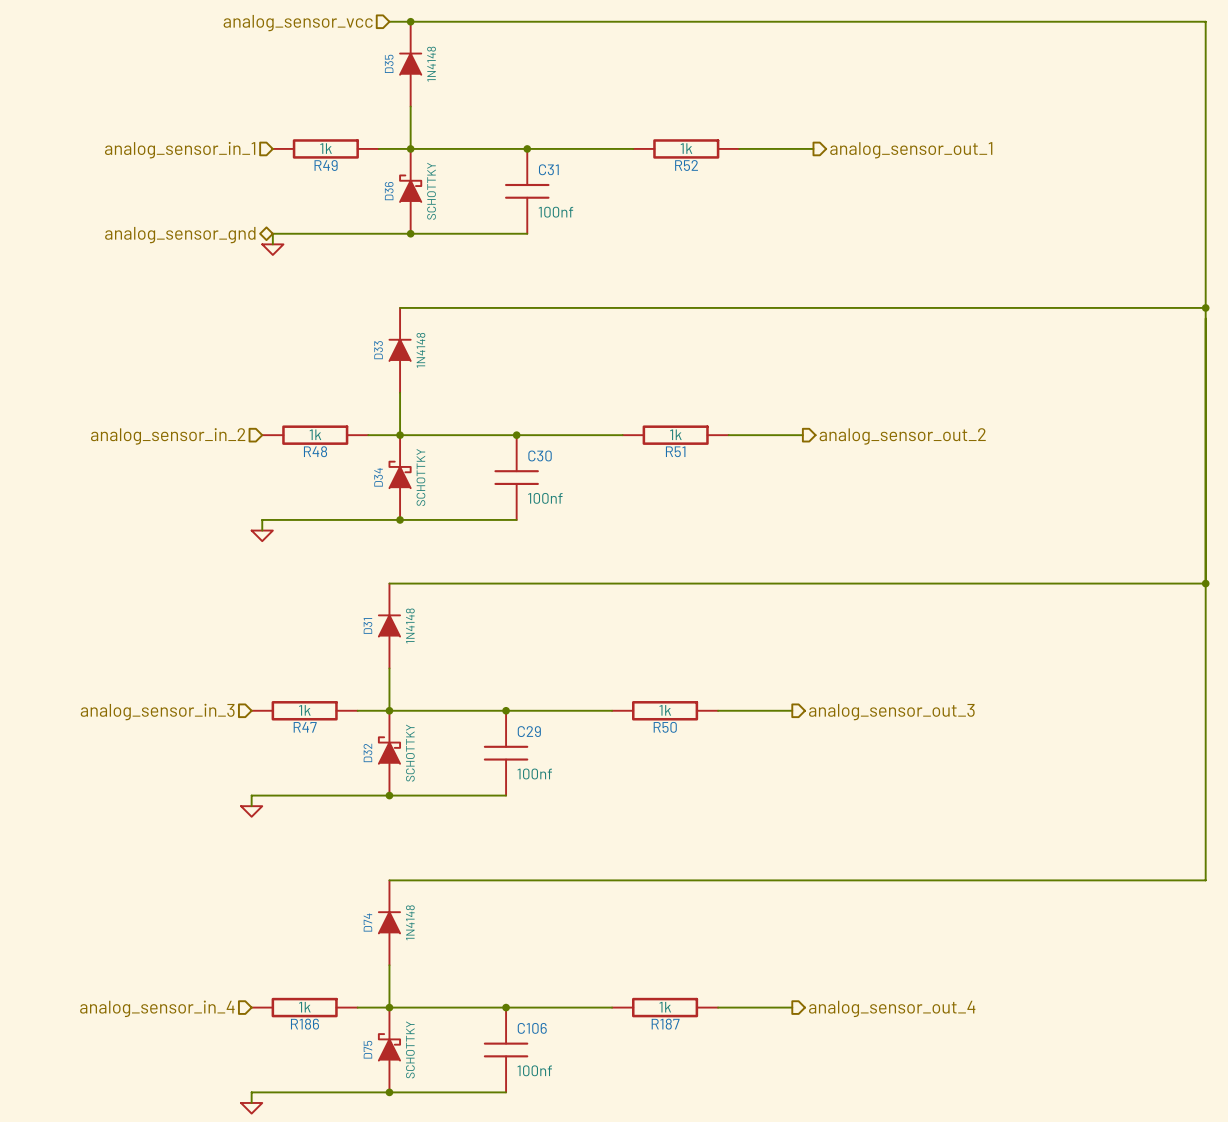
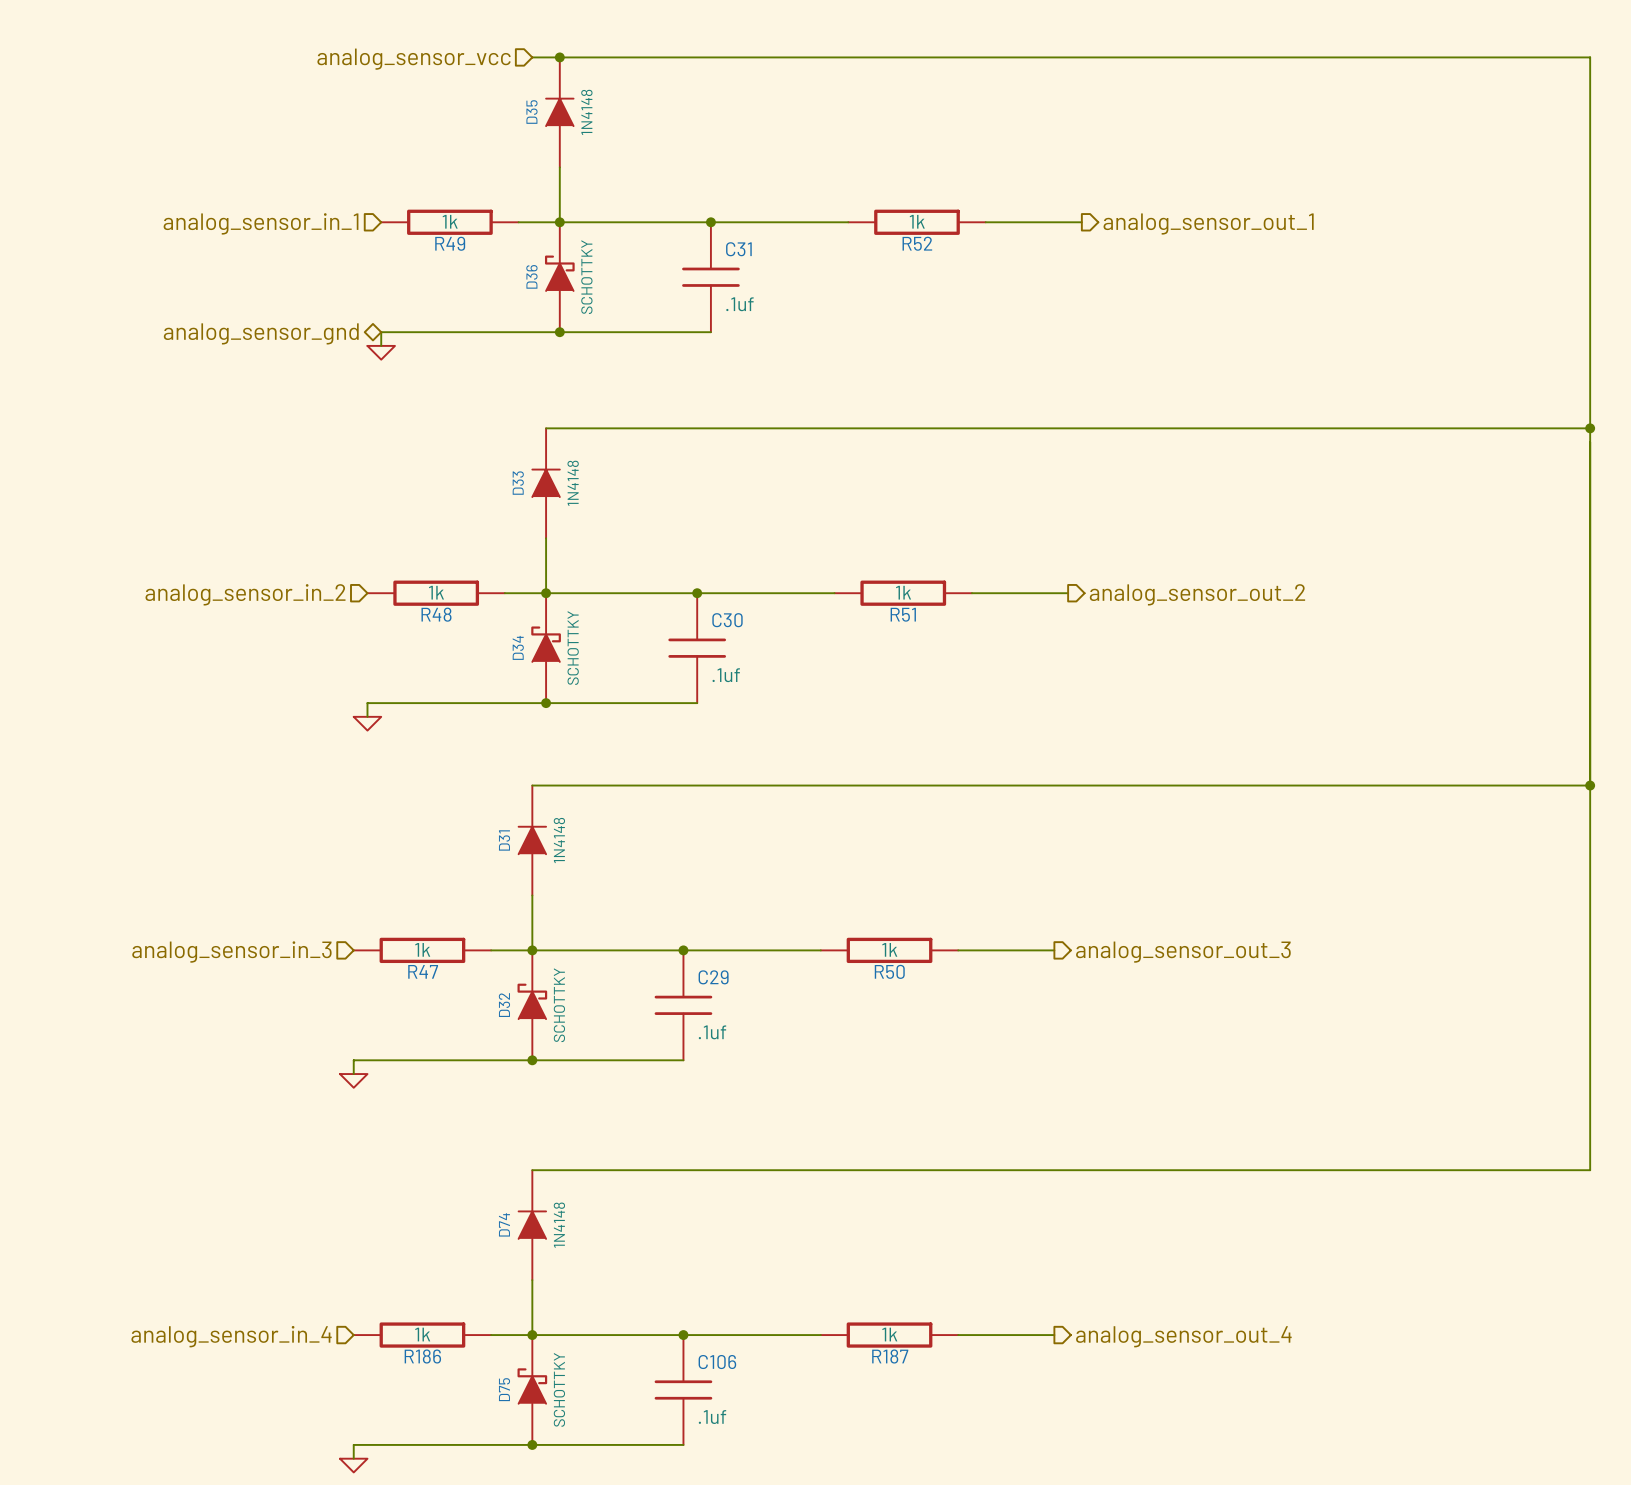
C31 value: 100nf (555, 212) -> .1uf (739, 304)
C30 value: 100nf (545, 498) -> .1uf (726, 675)
C29 value: 100nf (534, 773) -> .1uf (712, 1032)
C106 value: 100nf (534, 1070) -> .1uf (712, 1417)

